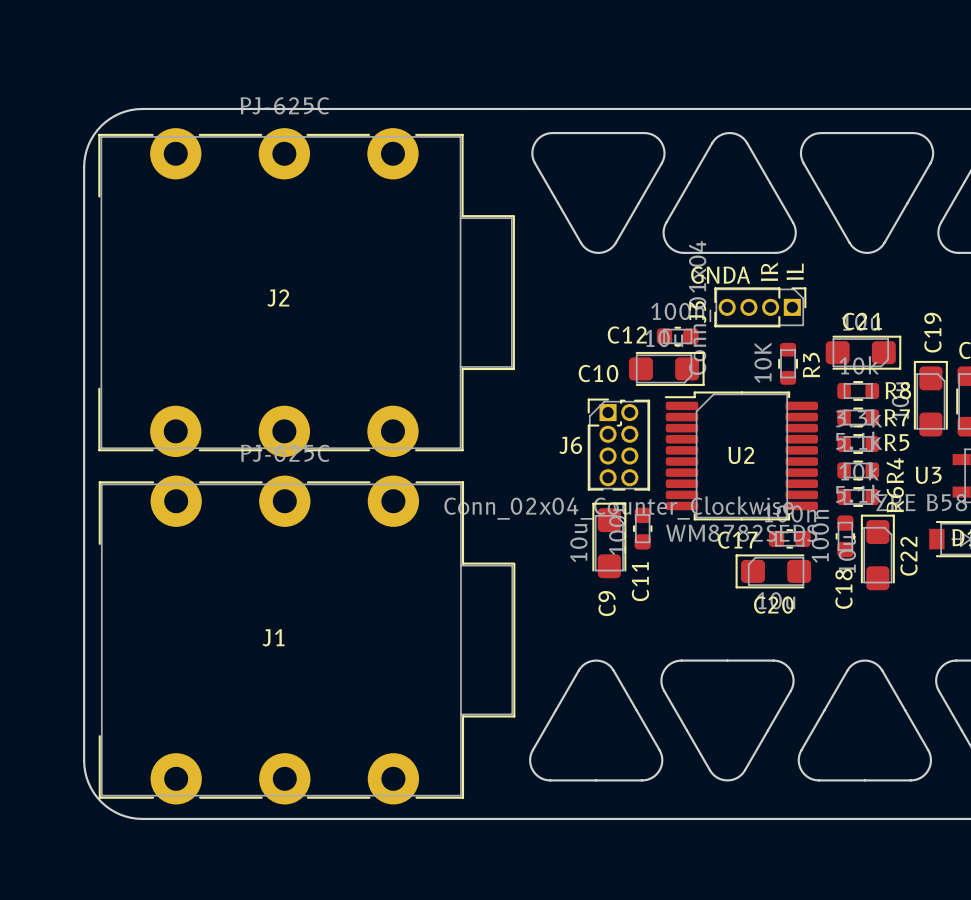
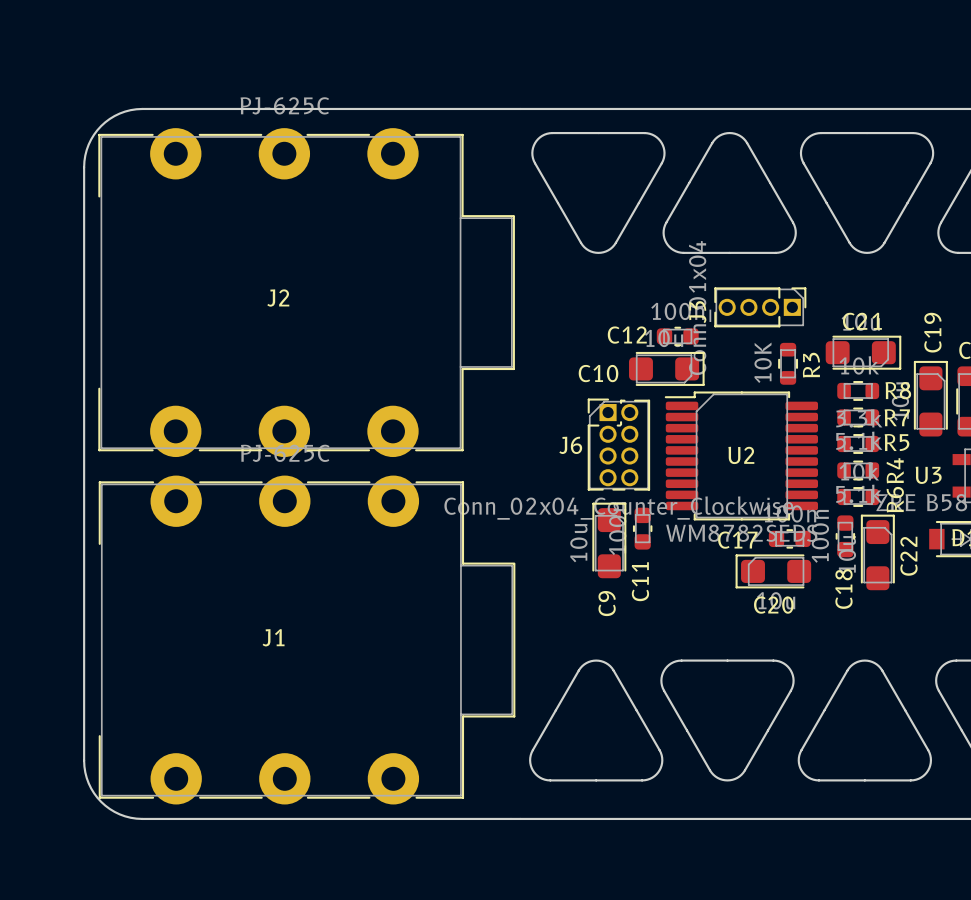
text: IR (769, 271) -> none
text: IL (795, 271) -> none
text: GNDA (720, 275) -> none

